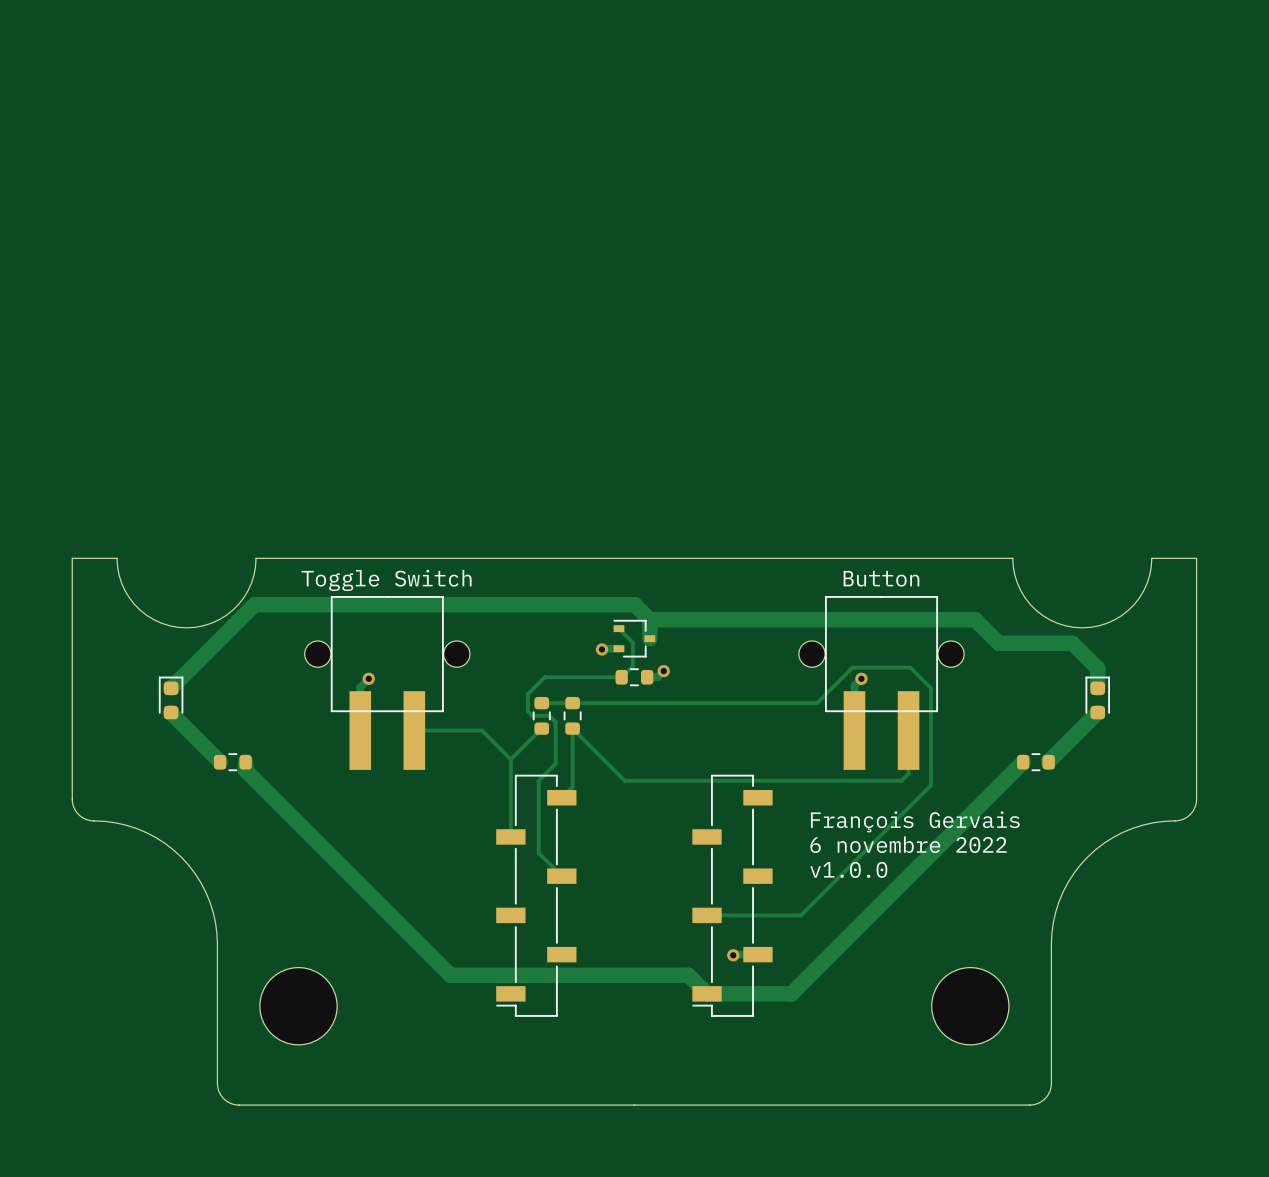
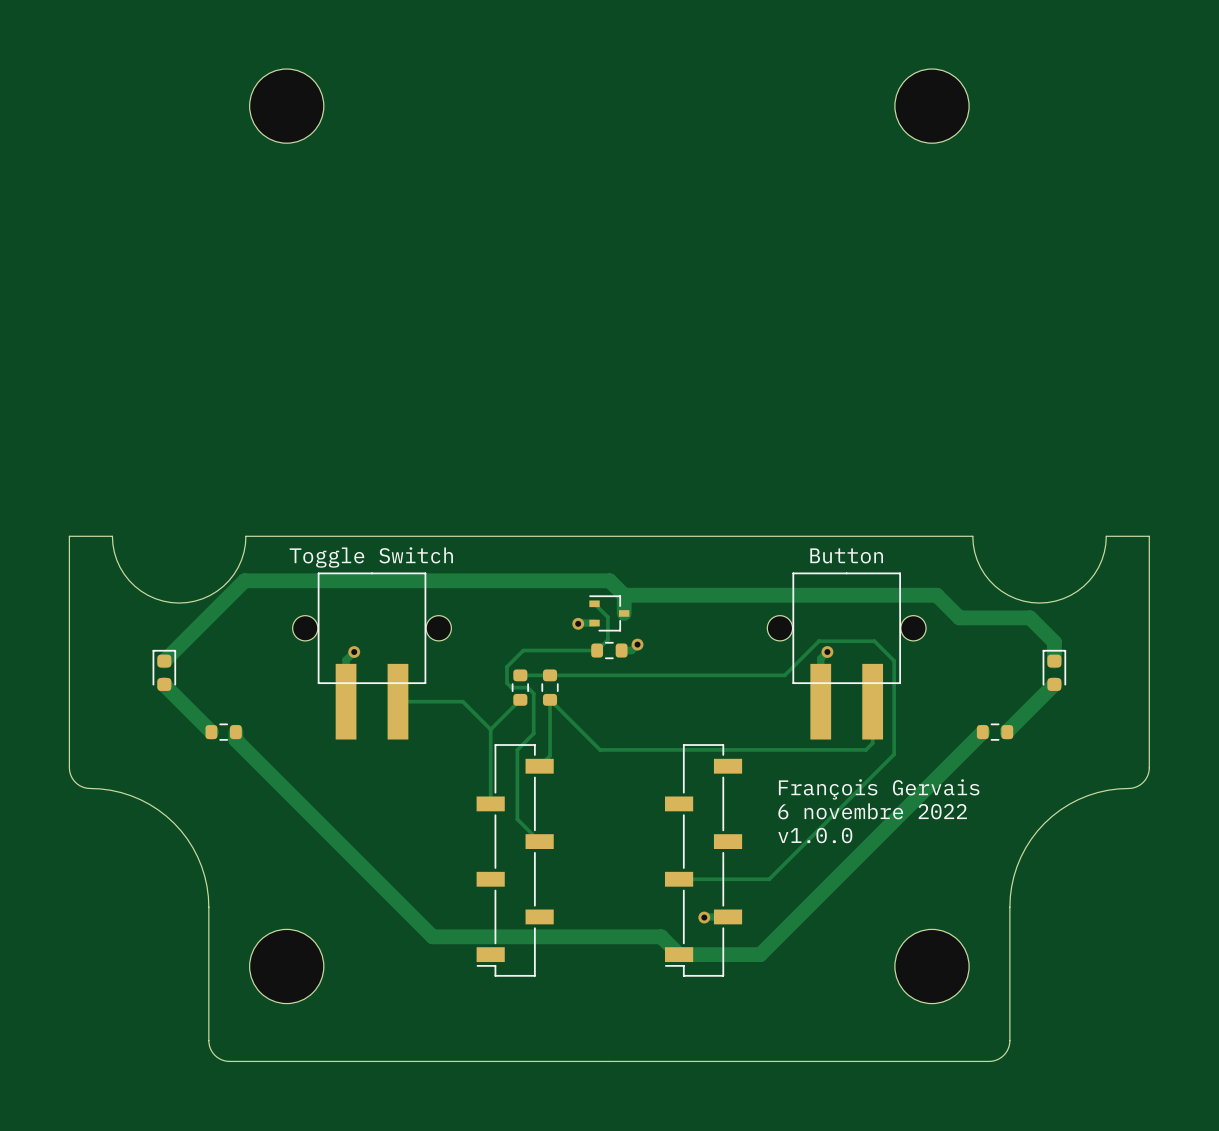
part: none -> (286, 106)
part: none -> (932, 106)

